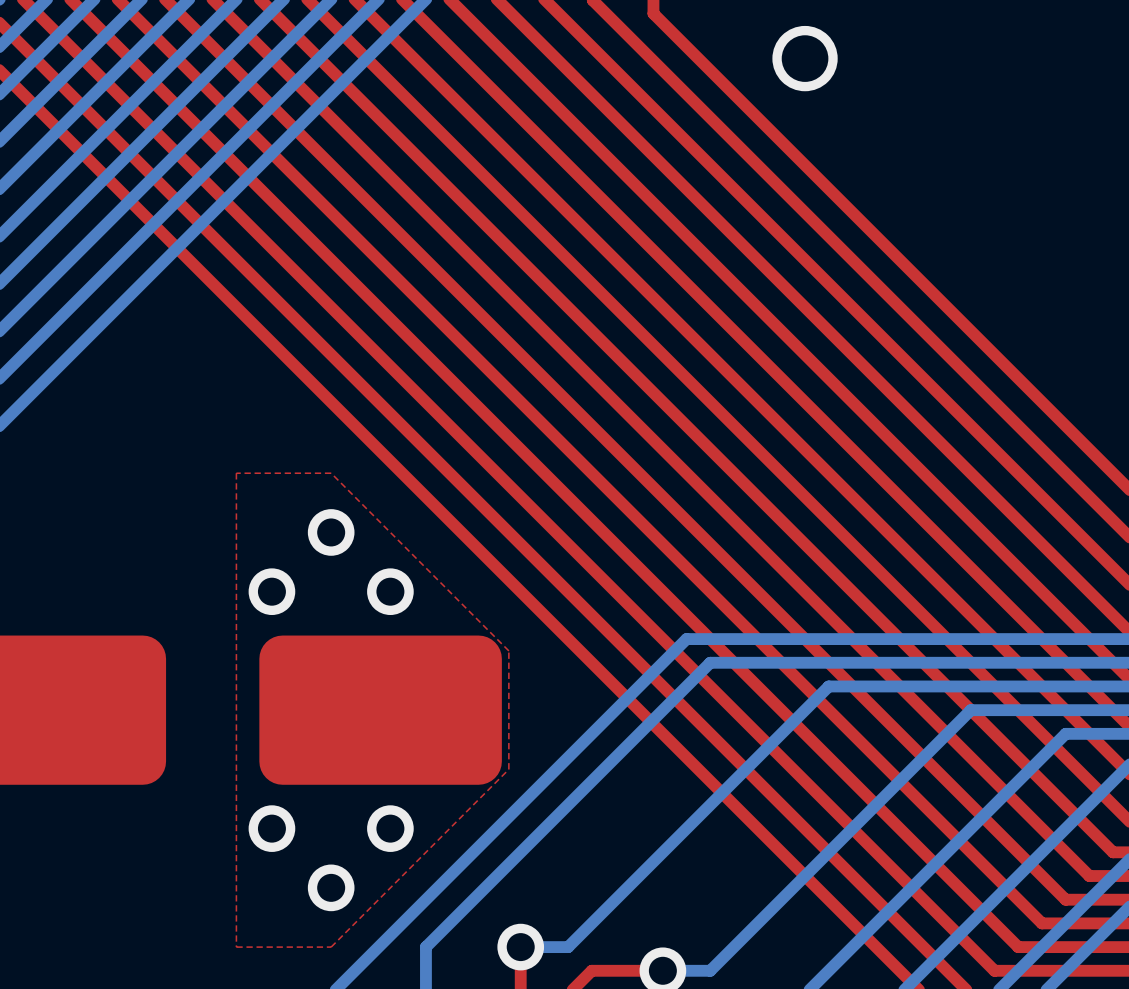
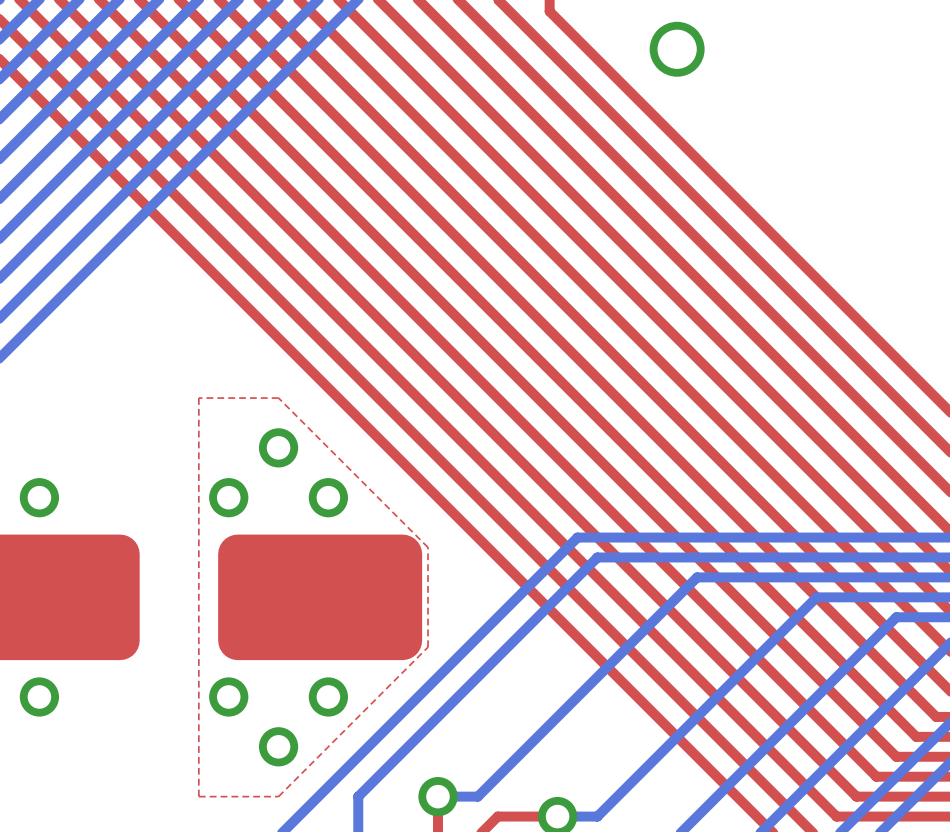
via: none -> (39, 497)
via: none -> (39, 696)

